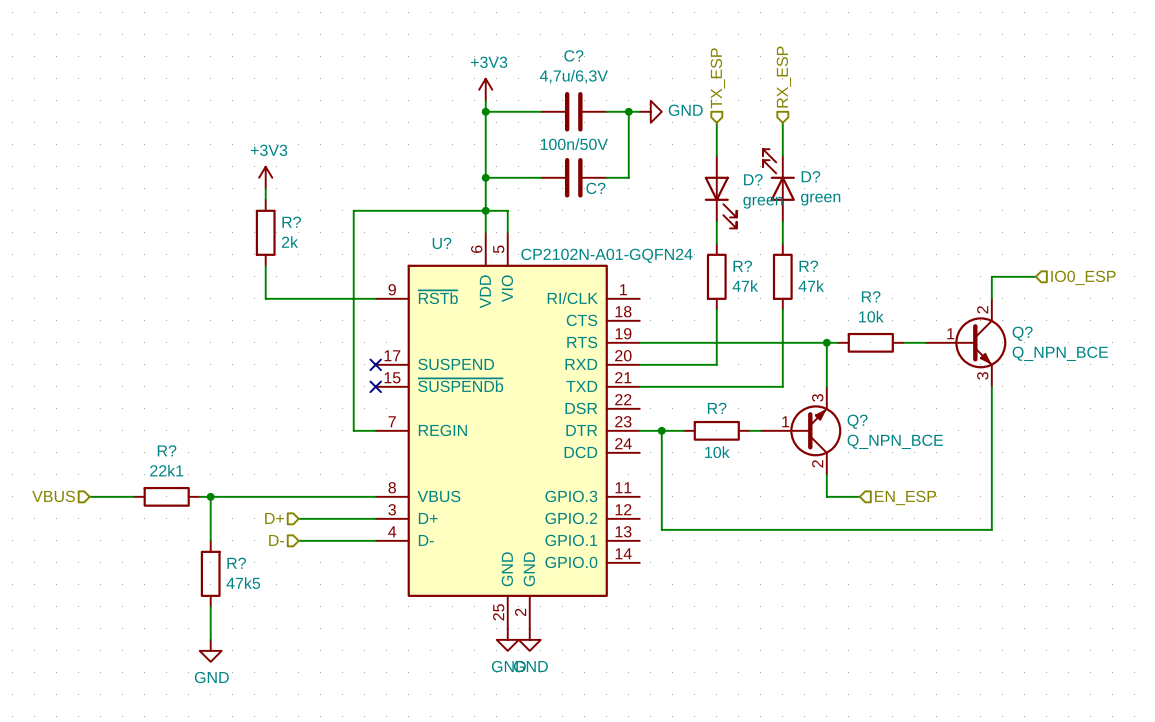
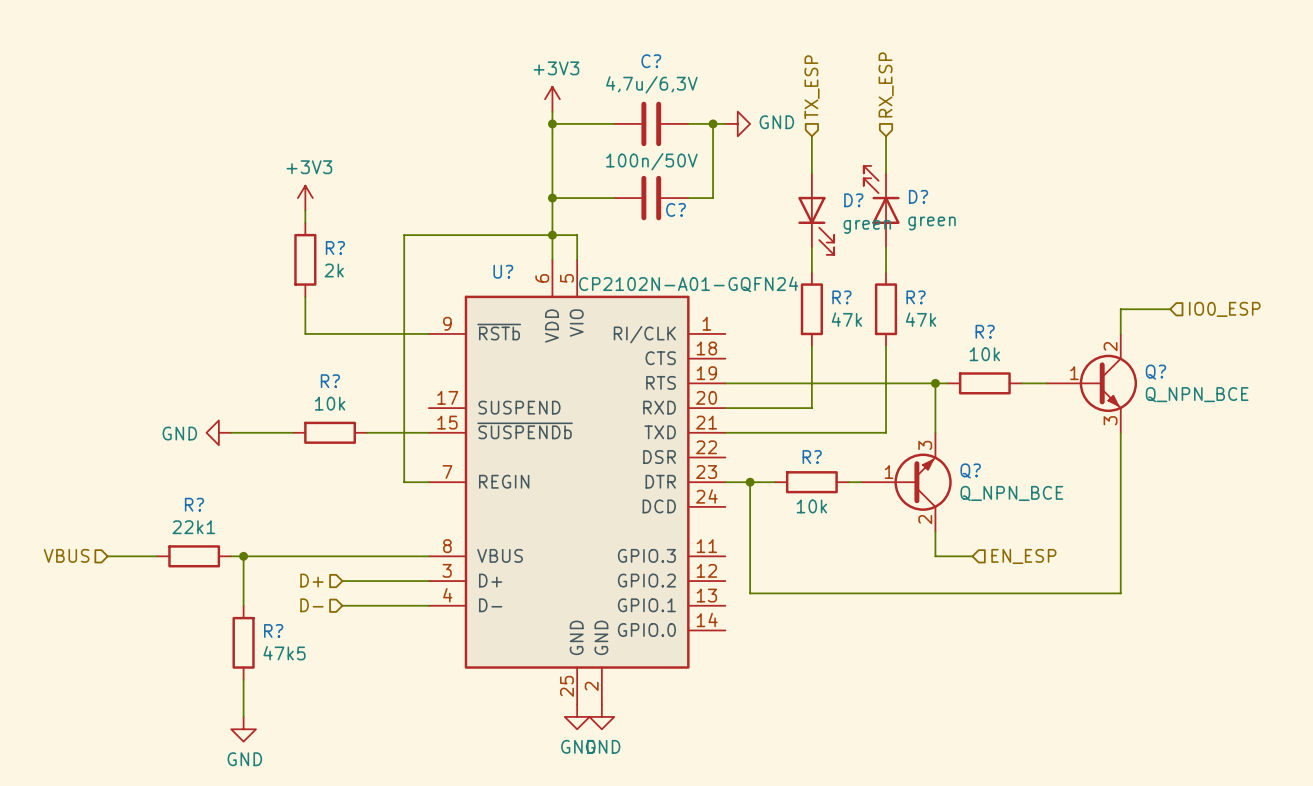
no-connect mark: (375, 364) -> none
power symbol: none -> GND (218, 432)
wire: none -> (231, 432) (293, 432)
R?: none -> 10k (330, 432)
wire: none -> (367, 432) (428, 432)
no-connect mark: (375, 386) -> none

